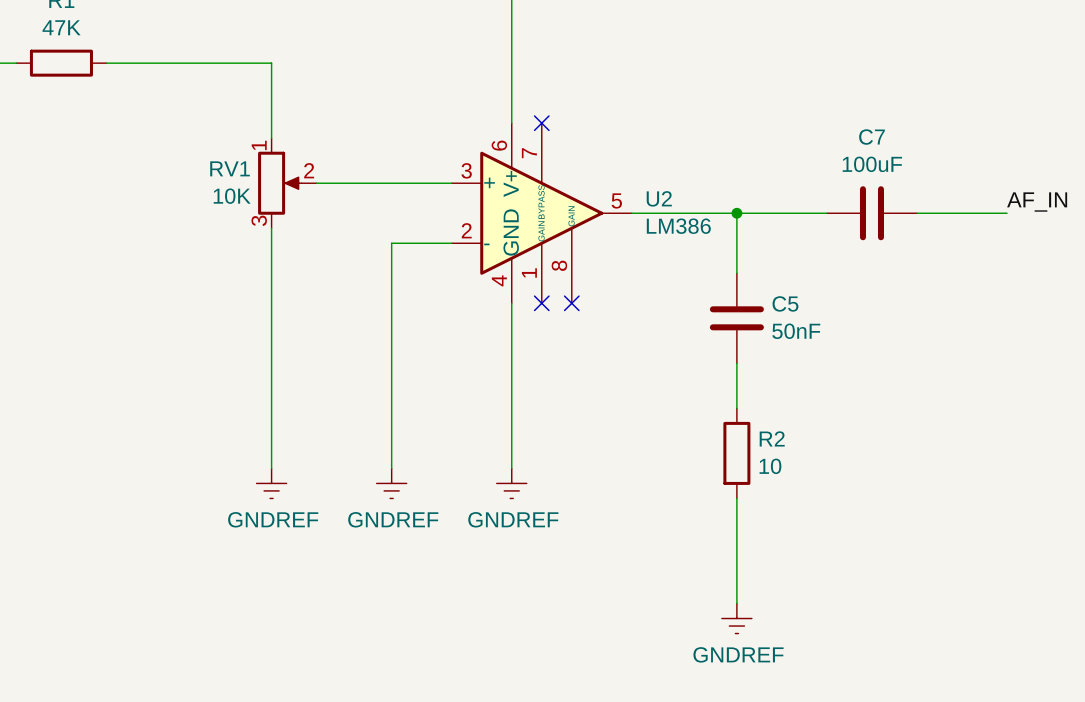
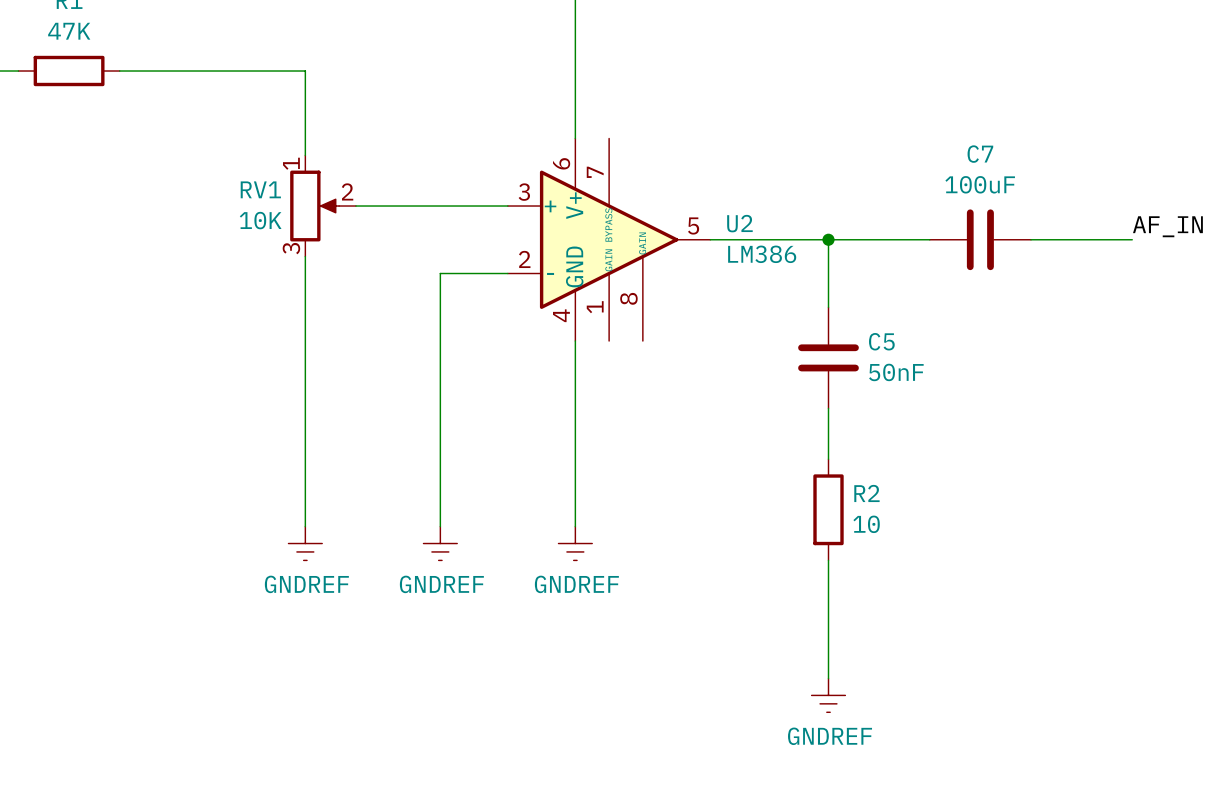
no-connect mark: (541, 123) -> none
no-connect mark: (541, 303) -> none
no-connect mark: (571, 303) -> none

